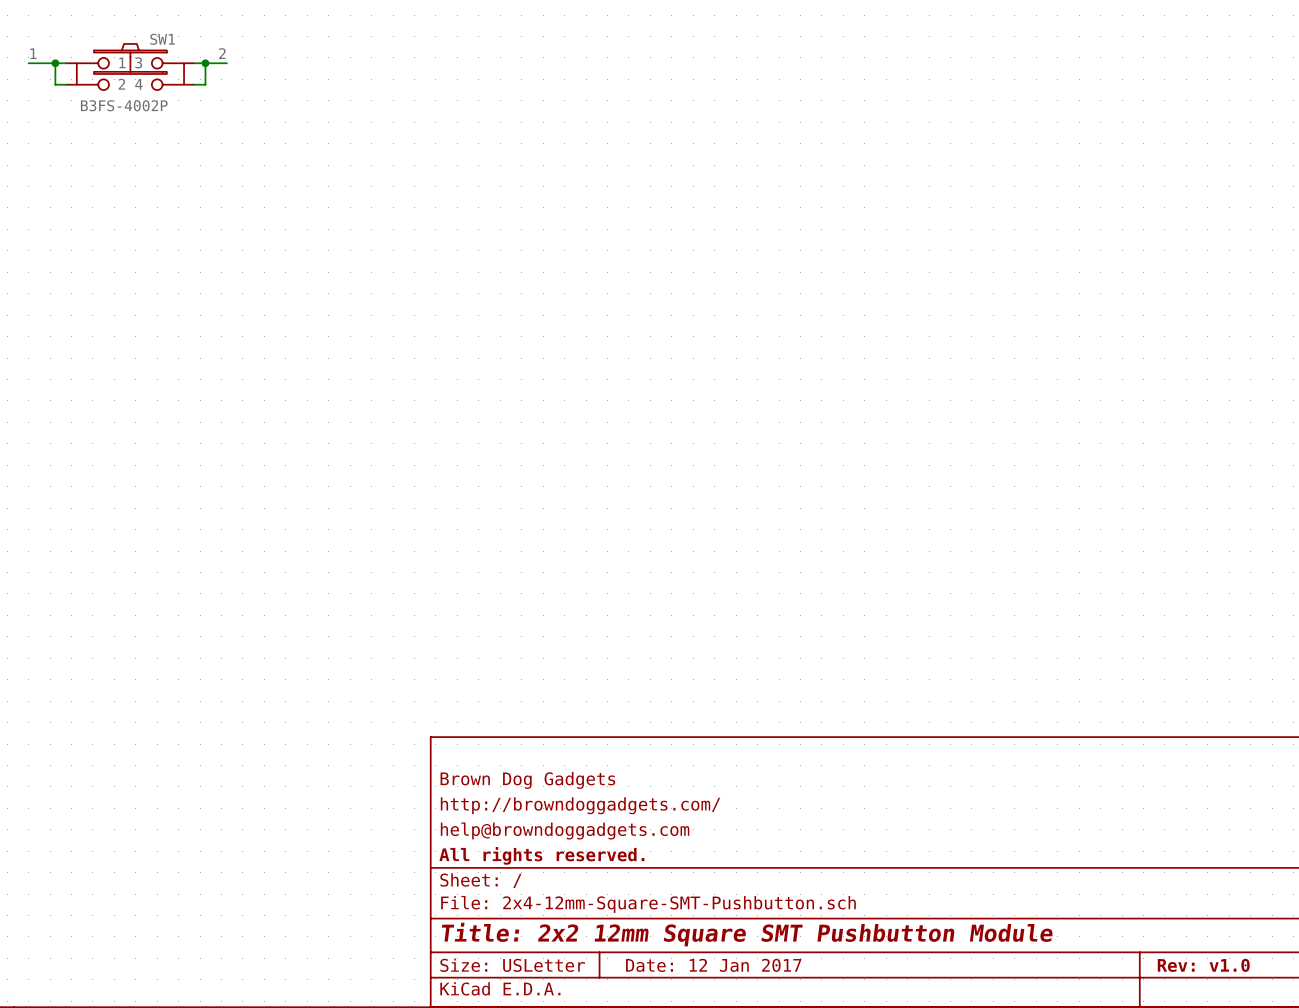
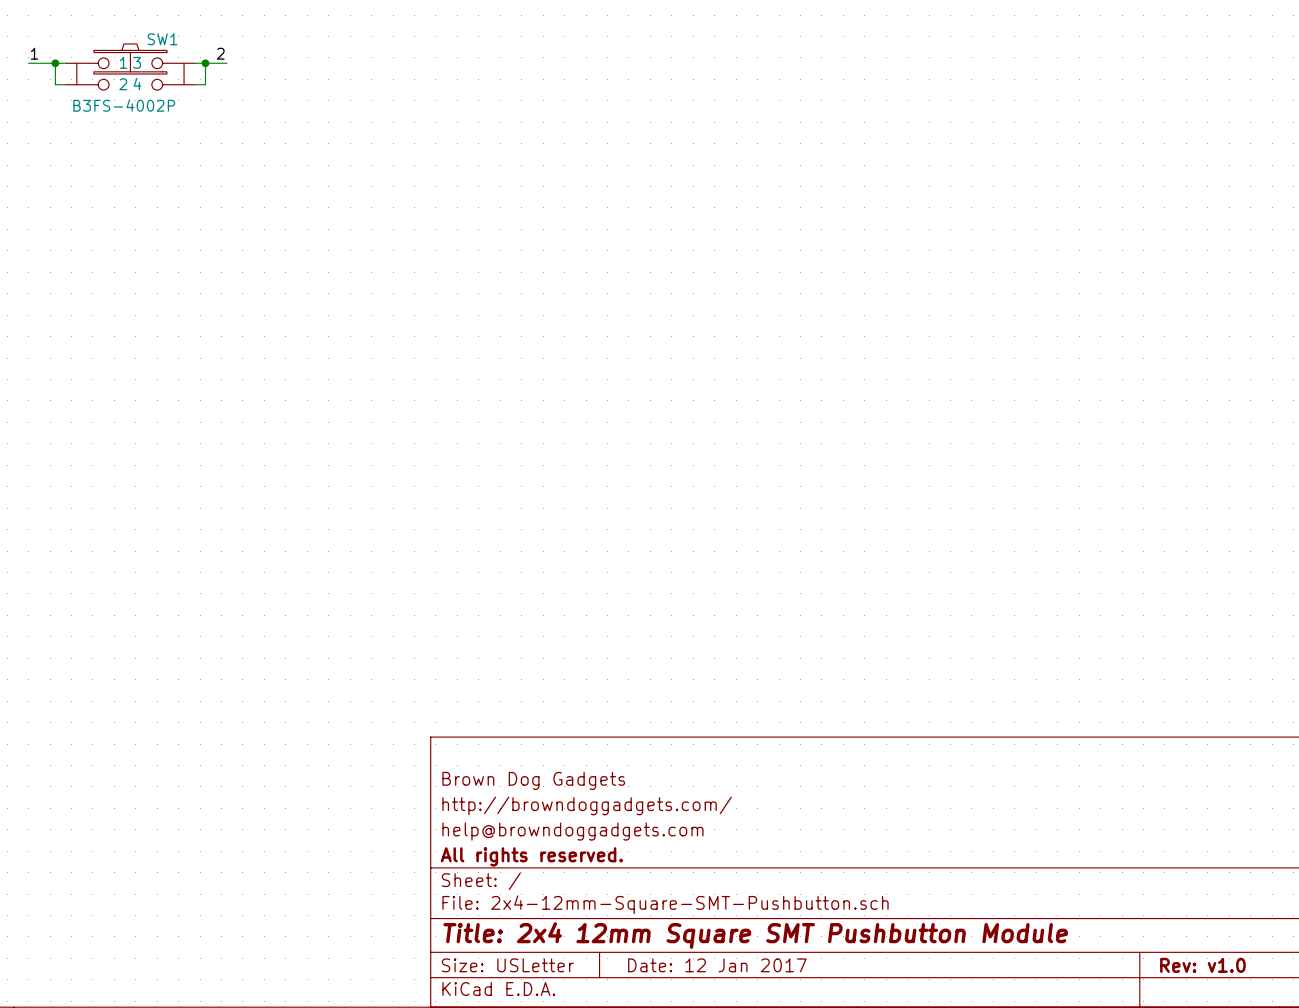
title block: Title: 2x2 12mm Square SMT Pushbutton Module (747, 934) -> Title: 2x4 12mm Square SMT Pushbutton Module (755, 935)

